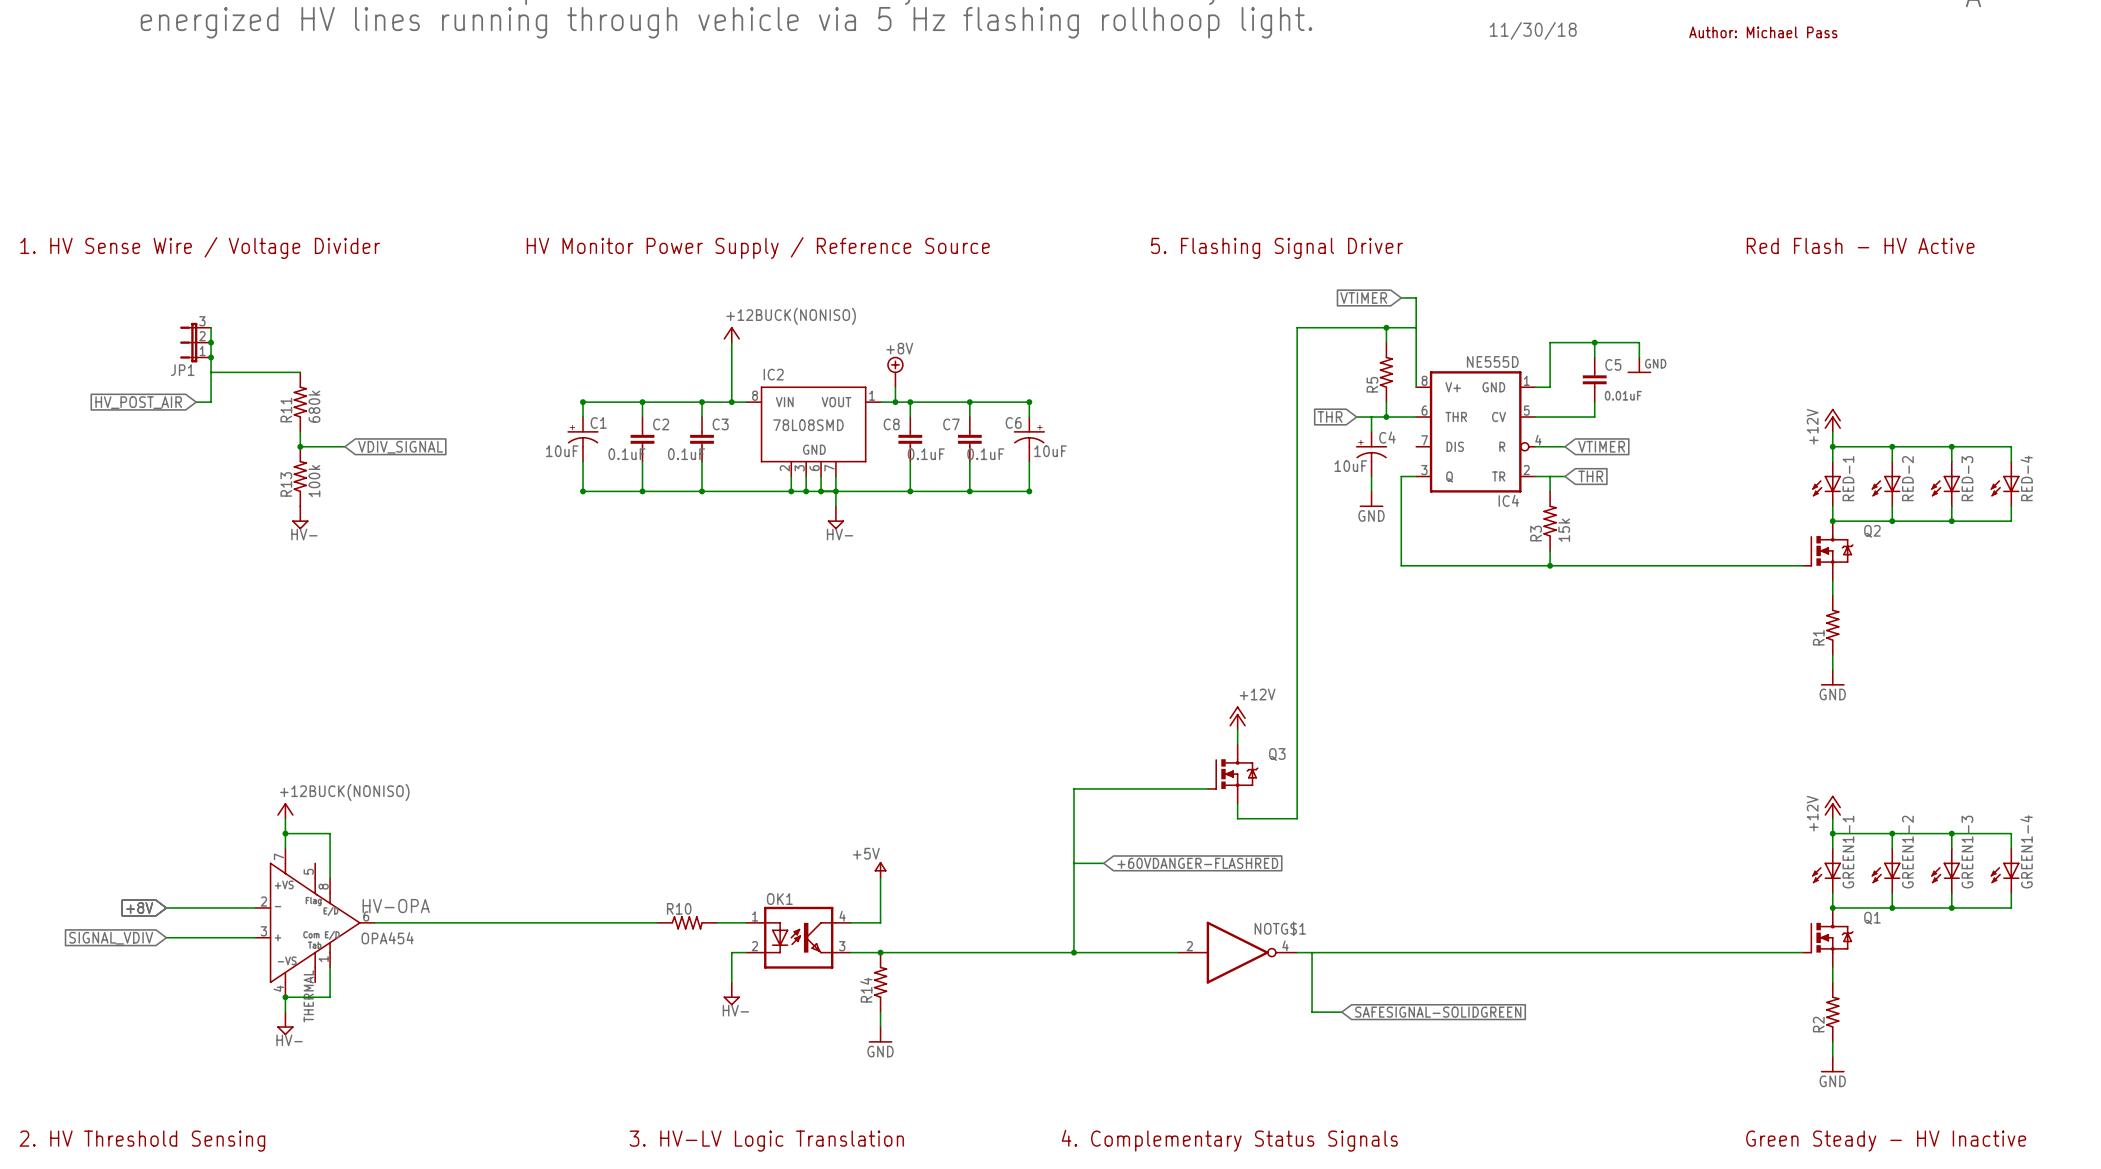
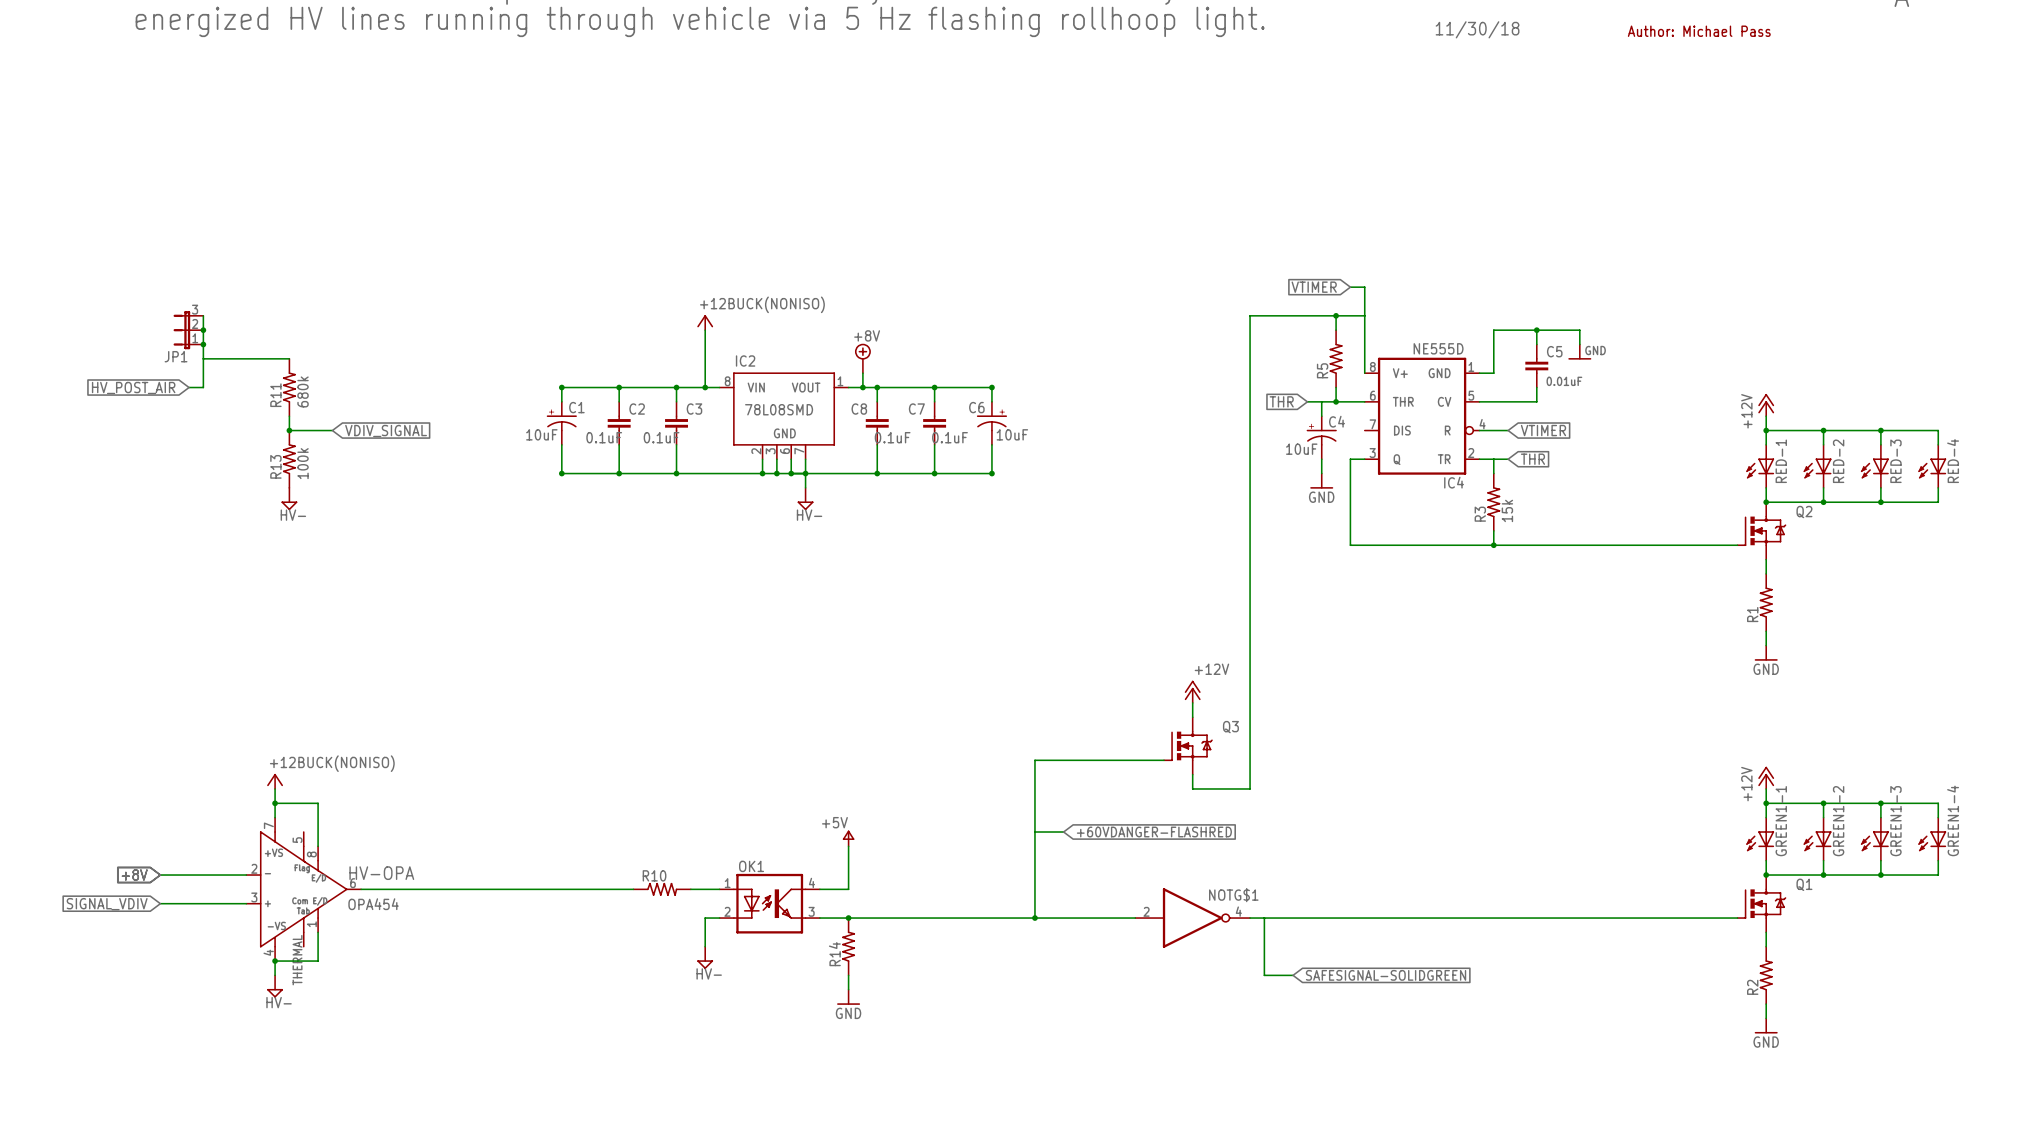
text: Red Flash - HV Active (1860, 245) -> none
text: 1. HV Sense Wire / Voltage Divider (200, 248) -> none
text: HV Monitor Power Supply / Reference Source (758, 248) -> none
text: 5. Flashing Signal Driver (1276, 248) -> none
text: 4. Complementary Status Signals (1229, 1140) -> none
text: 2. HV Threshold Sensing (142, 1141) -> none
text: 3. HV-LV Logic Translation (766, 1141) -> none
text: Green Steady - HV Inactive (1886, 1141) -> none

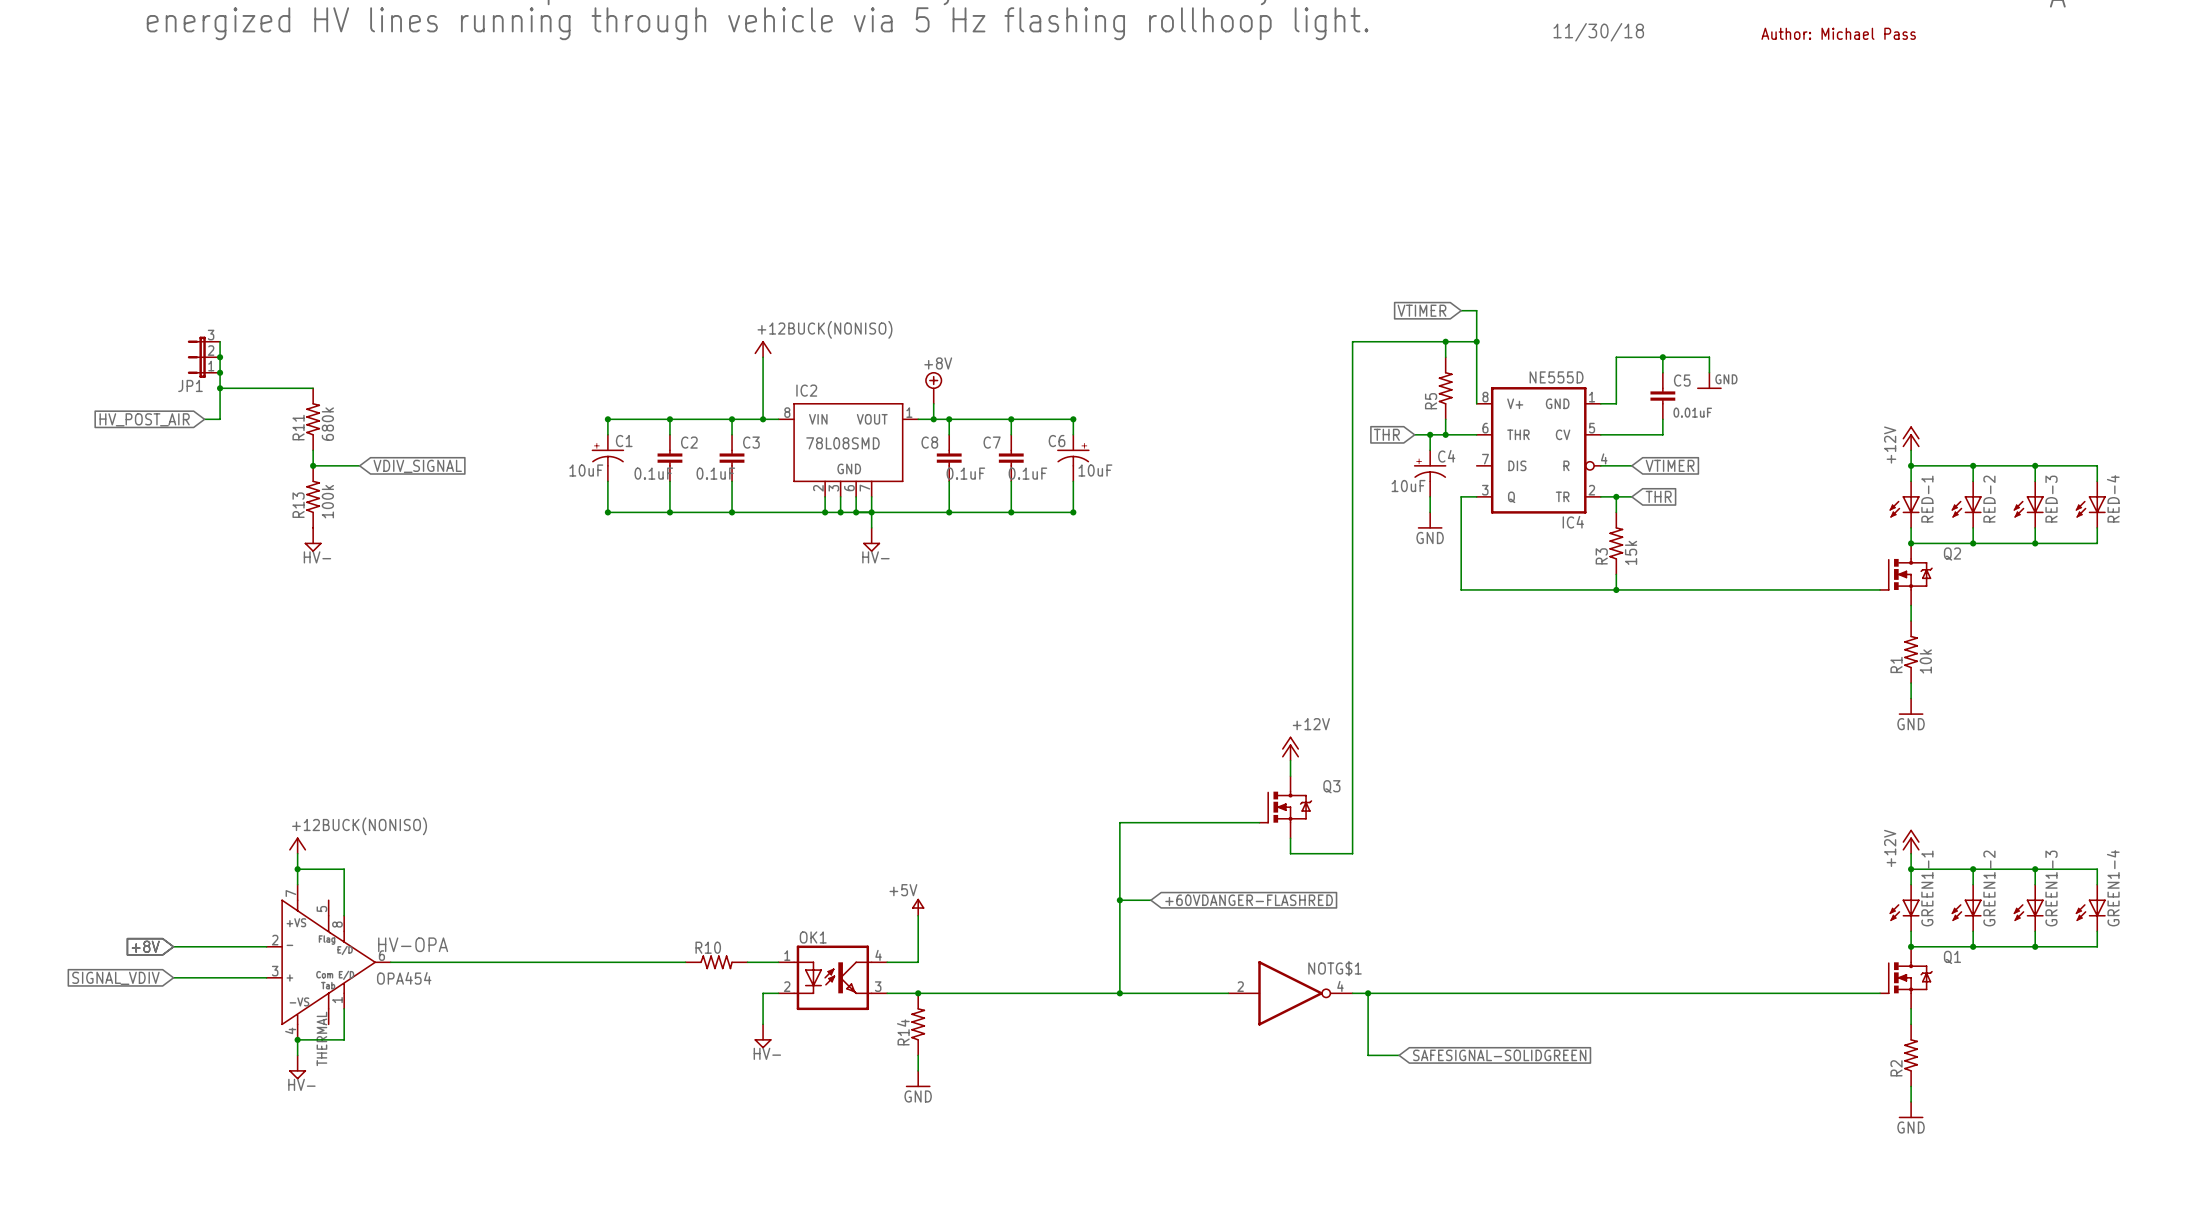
junction: none -> (1476, 341)
junction: none -> (220, 388)
junction: none -> (1430, 434)
junction: none -> (1616, 496)
R1 value: none -> 10k (1925, 661)
junction: none -> (1119, 900)
junction: none -> (1368, 993)

